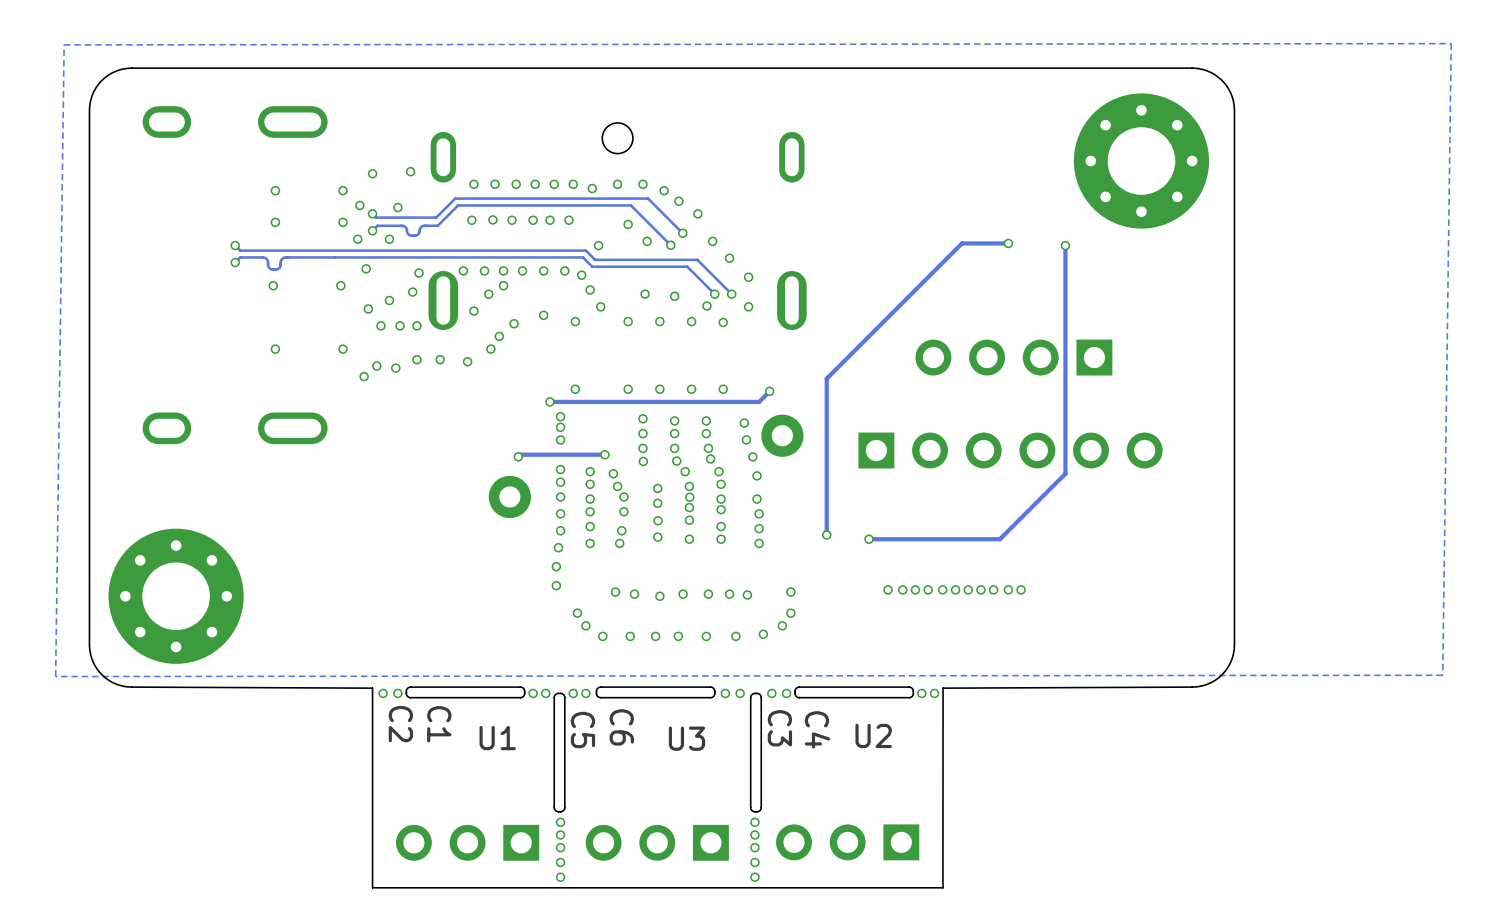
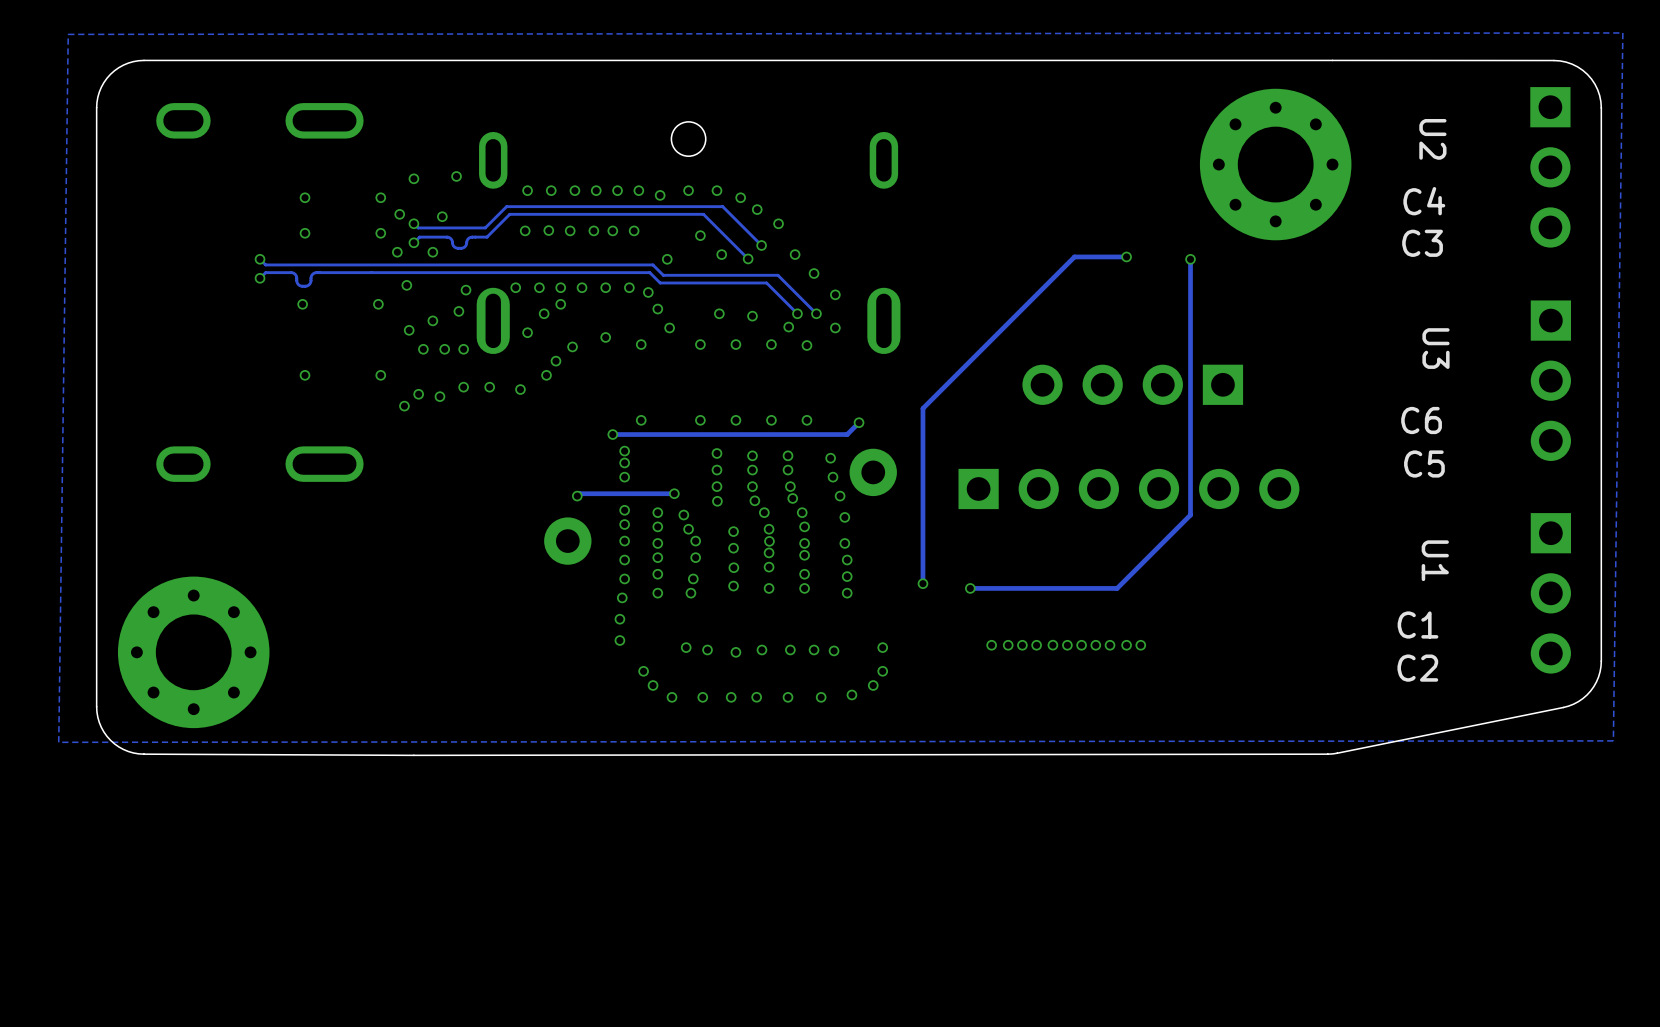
board edge: (1192, 68) (1210, 72) (1222, 80) (1230, 92) (1234, 105) (1234, 644) (1232, 658) (1227, 667) (1218, 677) (1210, 682) (1196, 686) (943, 688) (942, 887) (372, 887) (372, 688) -> (1332, 60) (1560, 60) (1572, 64) (1582, 70) (1591, 79) (1597, 89) (1601, 107) (1601, 661) (1596, 681) (1582, 698) (1563, 707) (1327, 754) (413, 755)
part: none -> (1550, 167)
part: none -> (1550, 380)
part: none -> (1550, 593)
board edge: (520, 687) (410, 687) (406, 689) (406, 693) (410, 697) (520, 697) (524, 693) (524, 689) (520, 687) -> none
board edge: (710, 687) (600, 687) (597, 689) (596, 693) (600, 697) (710, 697) (714, 693) (714, 689) (710, 687) -> none
board edge: (909, 687) (799, 687) (795, 689) (795, 693) (799, 697) (909, 697) (913, 693) (912, 689) (909, 687) -> none
via: (383, 693) -> none
via: (397, 693) -> none
via: (533, 693) -> none
via: (545, 693) -> none
board edge: (560, 693) (556, 694) (554, 697) (554, 807) (558, 811) (562, 811) (564, 807) (564, 697) (560, 693) -> none
via: (573, 693) -> none
via: (585, 693) -> none
via: (725, 693) -> none
via: (740, 693) -> none
board edge: (757, 693) (752, 694) (750, 697) (750, 807) (754, 811) (759, 811) (761, 807) (761, 697) (757, 693) -> none
via: (771, 693) -> none
via: (786, 693) -> none
via: (921, 693) -> none
via: (934, 693) -> none
C2 position: (400, 724) -> (1417, 668)
C2 name rotation: 0° (400, 724) -> 90° counterclockwise (1417, 668)
C1 position: (439, 724) -> (1418, 625)
C1 name rotation: 0° (439, 724) -> 90° counterclockwise (1418, 625)
C6 position: (621, 727) -> (1421, 420)
C6 name rotation: 0° (621, 727) -> 90° counterclockwise (1421, 420)
C3 position: (779, 728) -> (1422, 243)
C3 name rotation: 0° (779, 728) -> 90° counterclockwise (1422, 243)
C5 position: (582, 729) -> (1424, 464)
C5 name rotation: 0° (582, 729) -> 90° counterclockwise (1424, 464)
C4 position: (817, 729) -> (1424, 201)
C4 name rotation: 0° (817, 729) -> 90° counterclockwise (1424, 201)
U2 position: (873, 735) -> (1432, 139)
U2 name rotation: 0° (873, 735) -> 90° clockwise (1432, 139)
U1 position: (497, 738) -> (1435, 560)
U1 name rotation: 0° (497, 738) -> 90° clockwise (1435, 560)
U3 position: (686, 738) -> (1435, 348)
U3 name rotation: 0° (686, 738) -> 90° clockwise (1435, 348)
via: (560, 822) -> none
via: (754, 822) -> none
via: (560, 834) -> none
via: (754, 834) -> none
part: (467, 842) -> none
part: (657, 842) -> none
part: (847, 842) -> none
via: (560, 847) -> none
via: (754, 847) -> none
via: (560, 862) -> none
via: (754, 862) -> none
via: (560, 877) -> none
via: (754, 877) -> none

